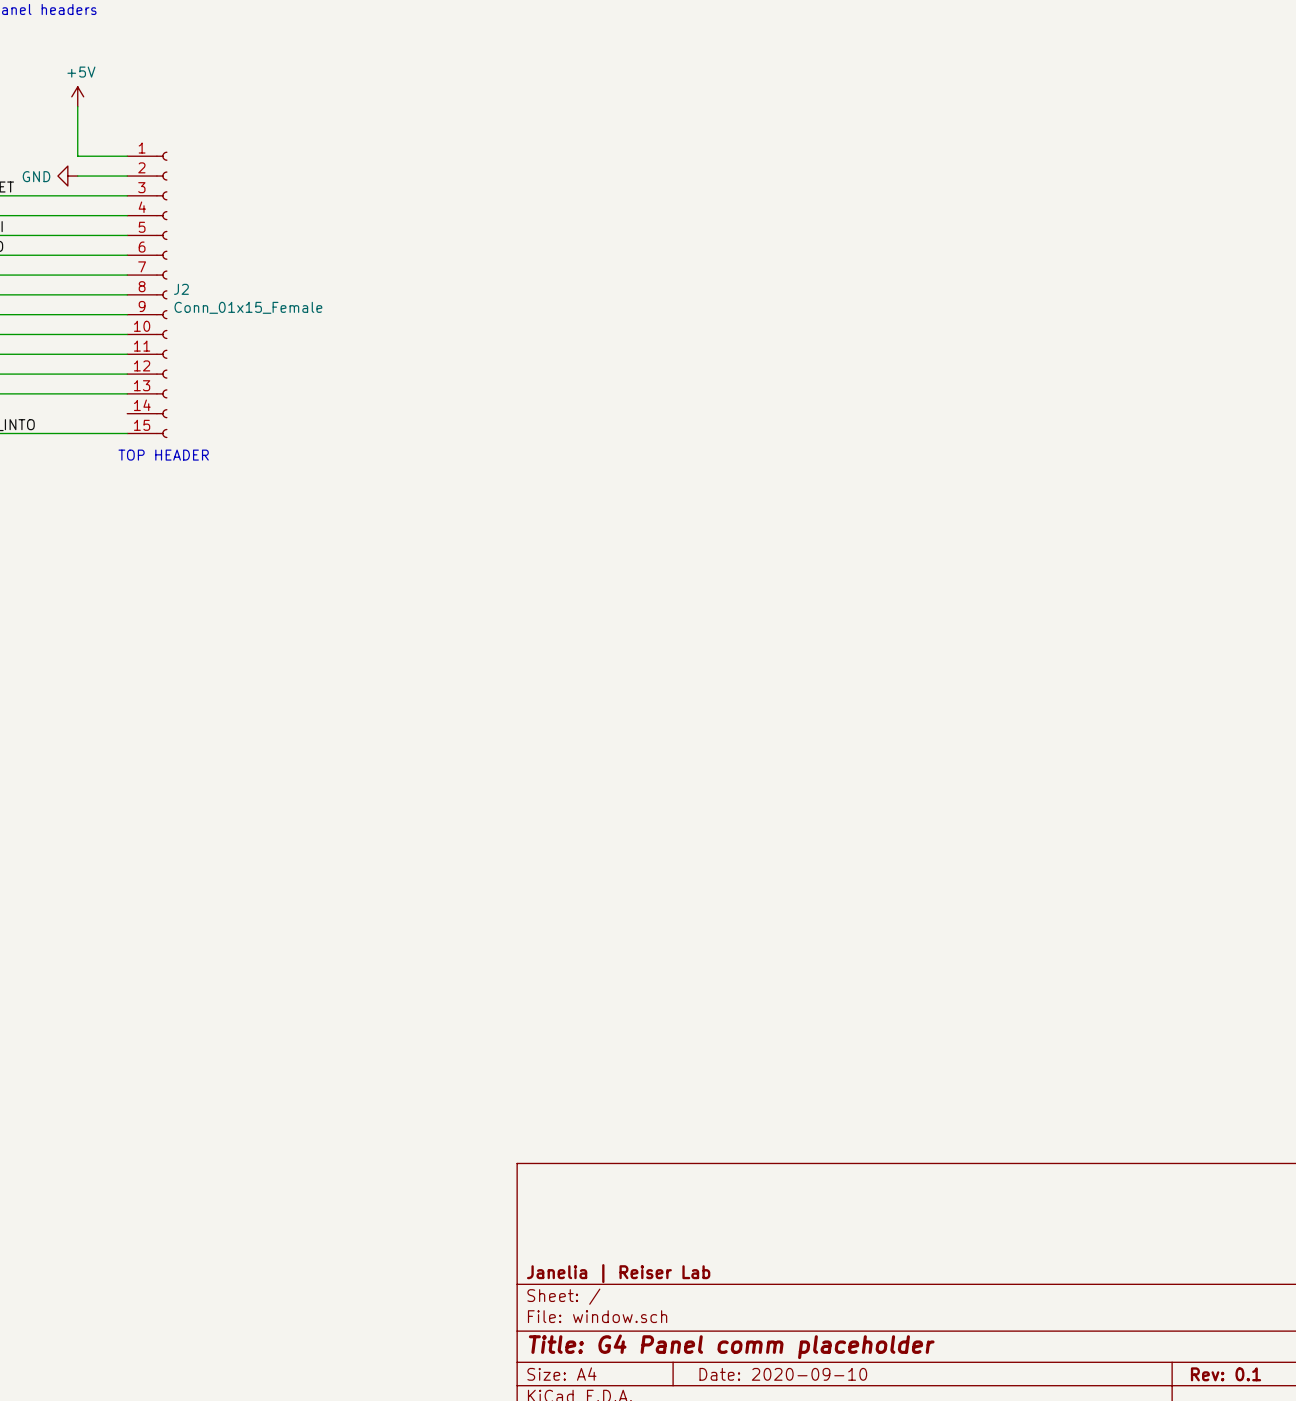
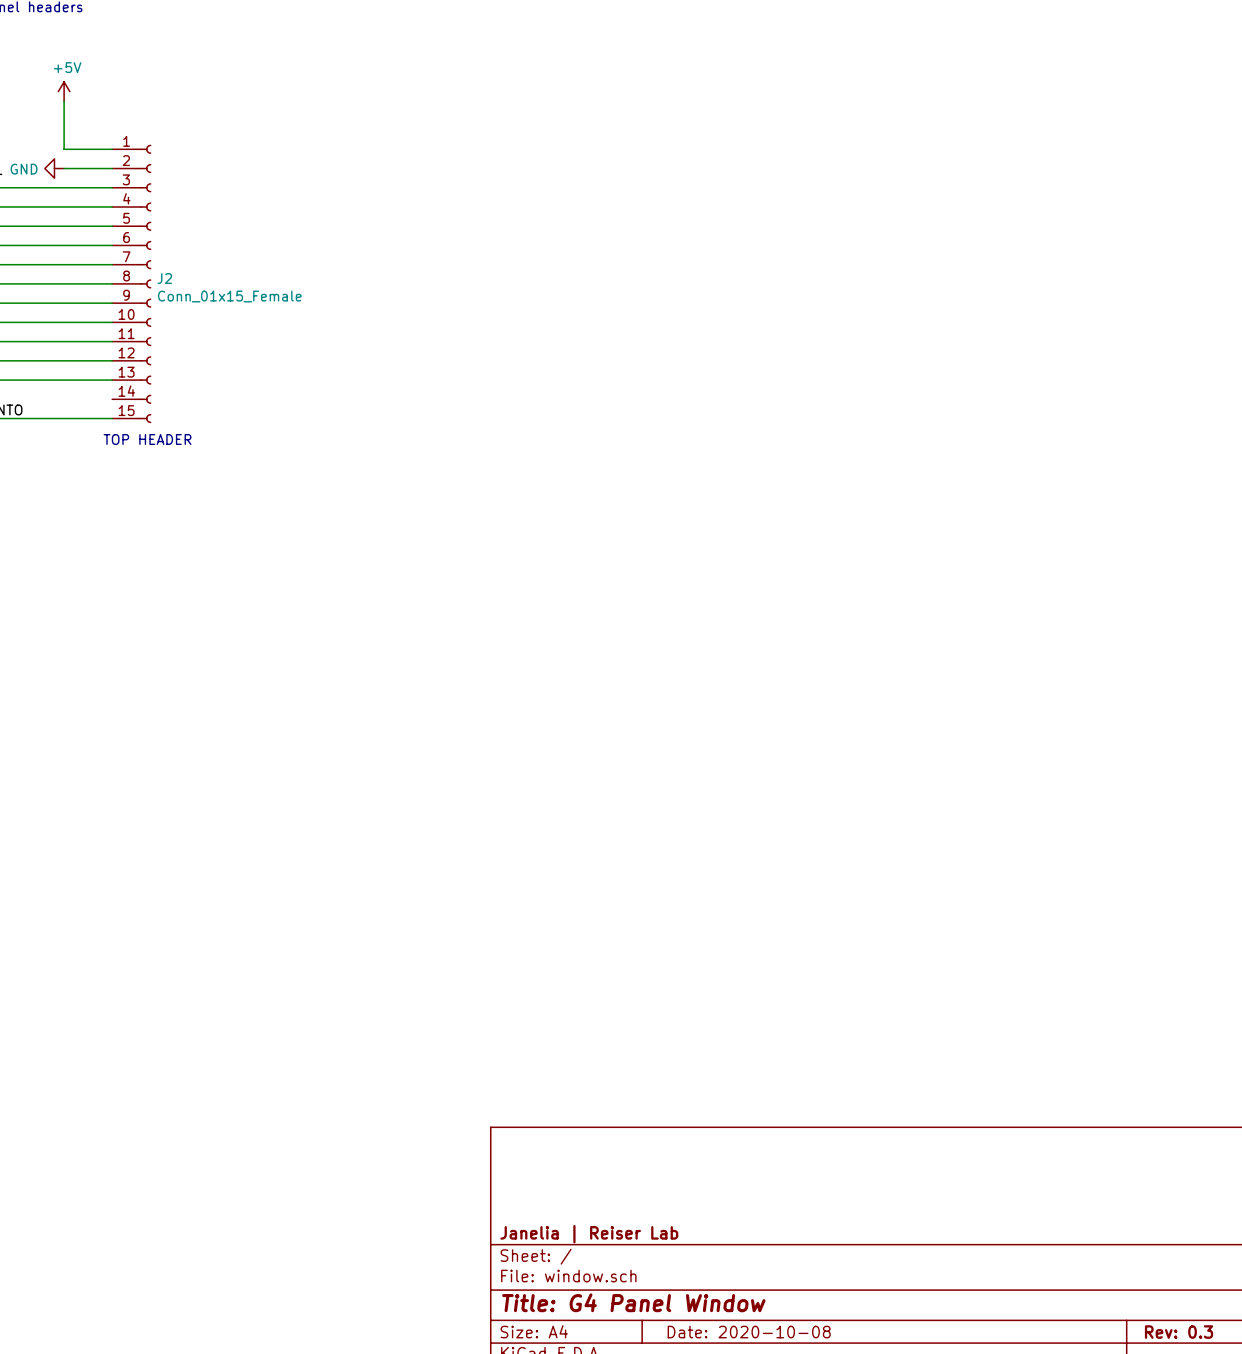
title block: Title: G4 Panel comm placeholder (731, 1346) -> Title: G4 Panel Window (633, 1302)
title block: Date: 2020-09-10 (783, 1374) -> Date: 2020-10-08 (749, 1332)
title block: Rev: 0.1 (1226, 1374) -> Rev: 0.3 (1179, 1332)

